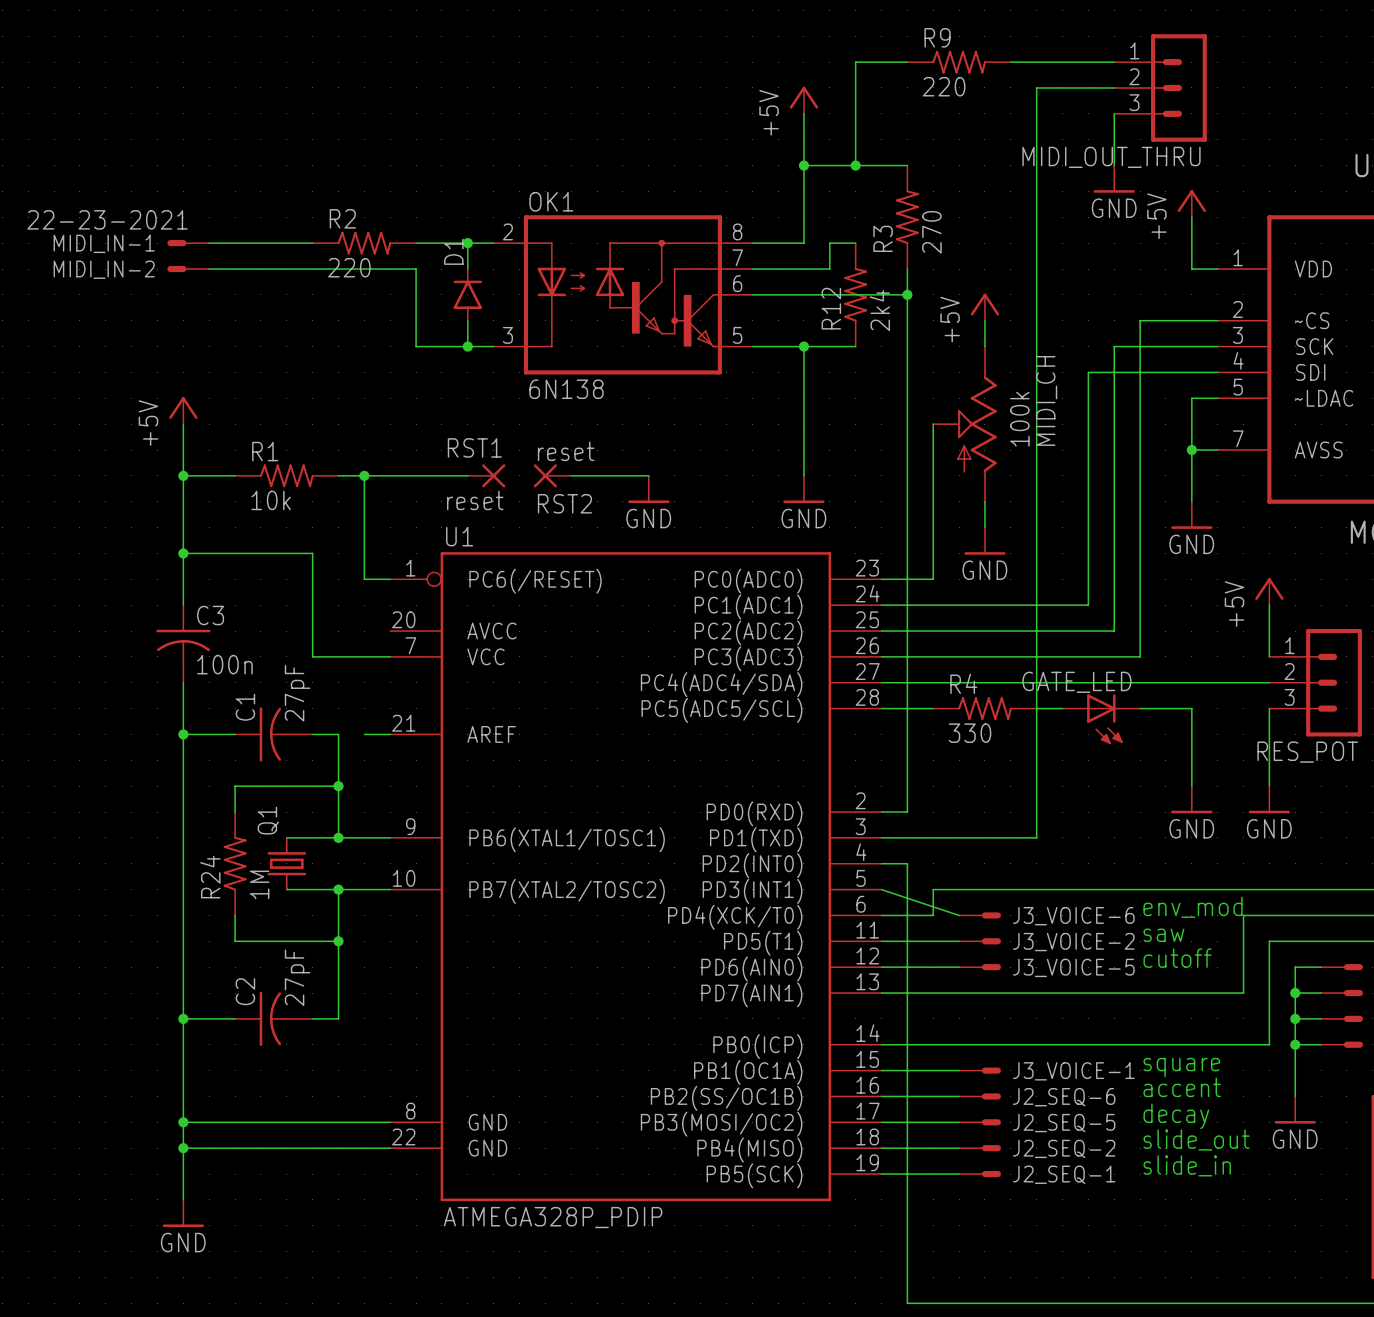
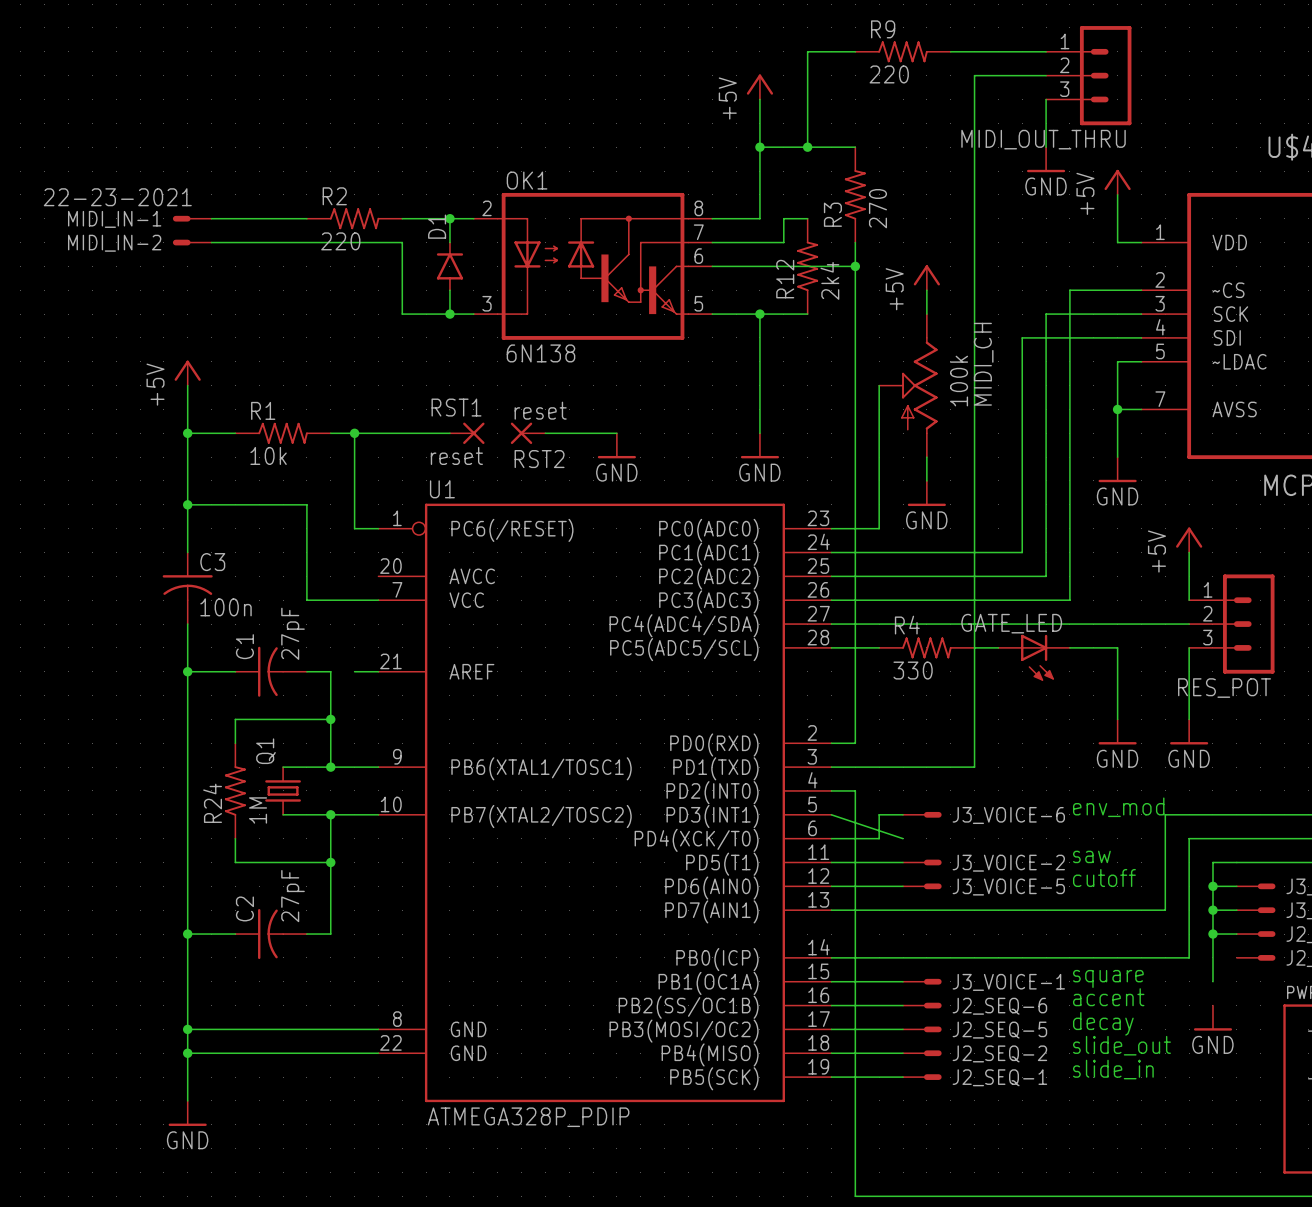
wire: (959, 889) (1243, 889) -> none
text position: env_mod (1193, 907) -> env_mod (1118, 807)
J3_VOICE-6 position: (980, 915) -> (922, 814)
wire: (1243, 915) (1269, 915) -> (1165, 838) (1165, 814)
wire: (1269, 941) (1295, 941) -> (1189, 862) (1189, 838)
junction: none -> (1212, 886)
wire: (1295, 1044) (1321, 1044) -> none
junction: (1295, 1044) -> none
wire: (1295, 1070) (1295, 1096) -> (1212, 862) (1212, 886)

